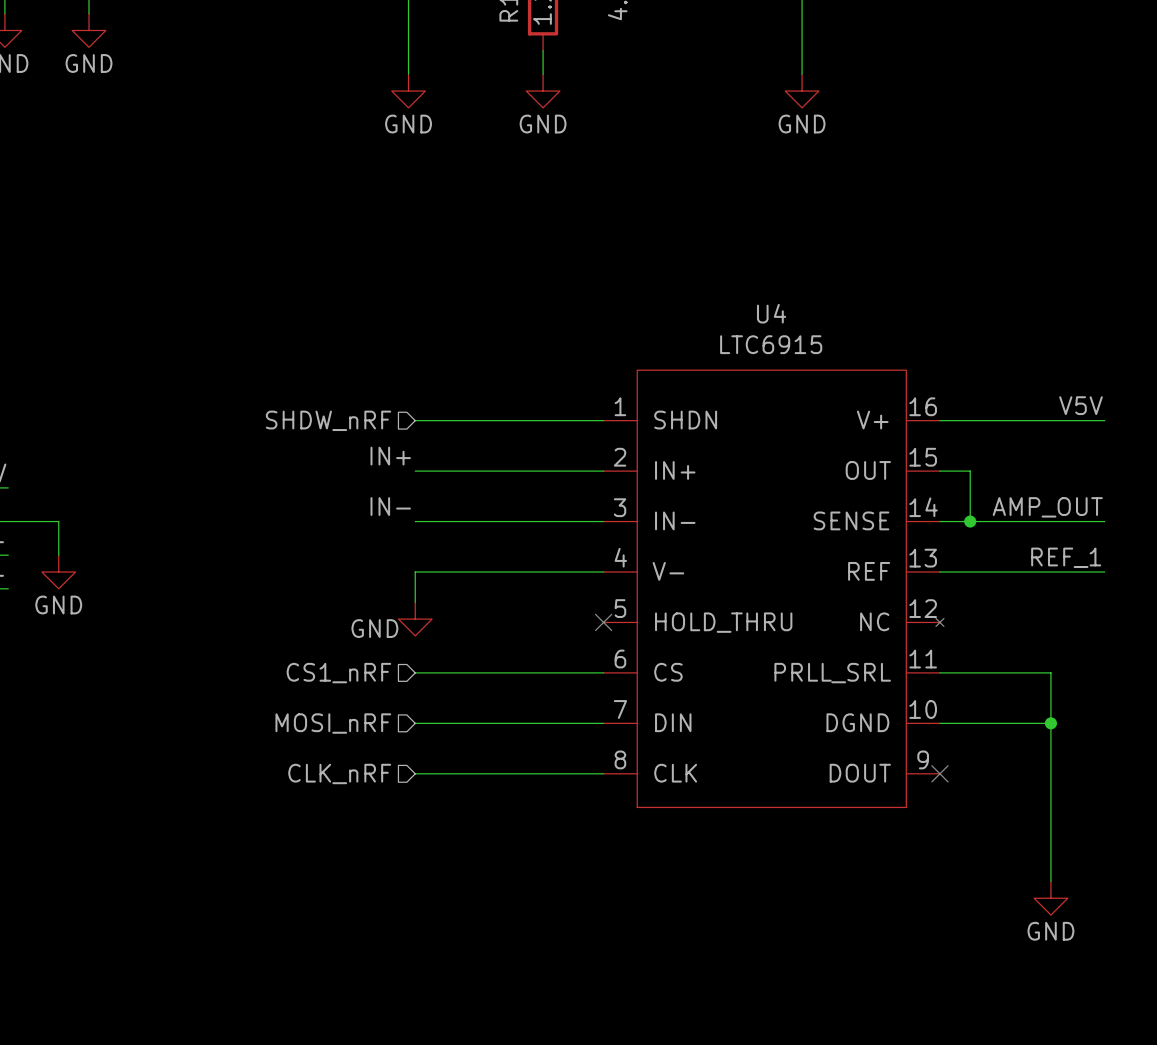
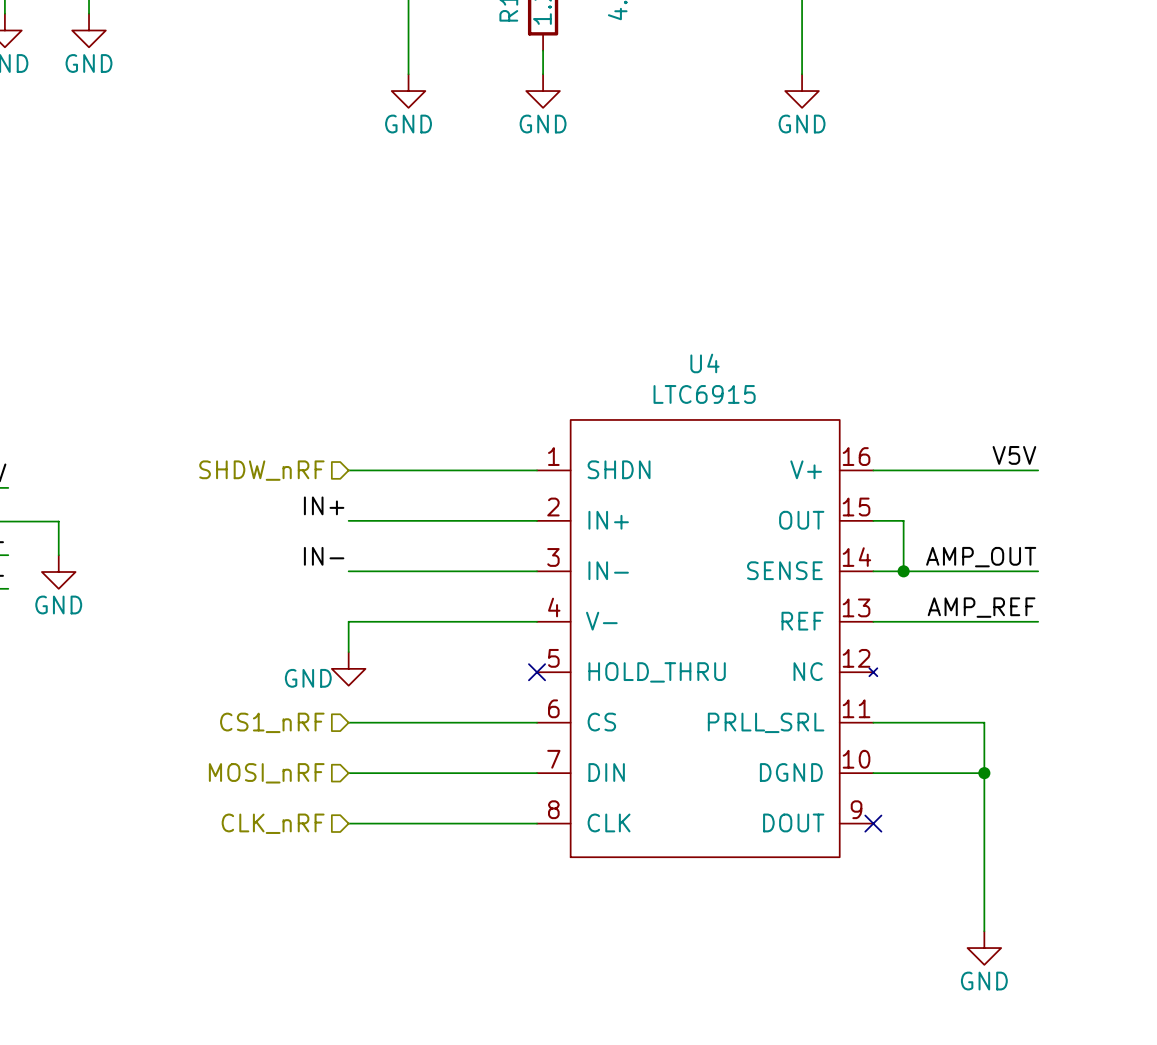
label position: V5V (1081, 405) -> V5V (1014, 455)
hierarchical label position: SHDW_nRF (328, 420) -> SHDW_nRF (261, 470)
wire: (415, 420) (603, 420) -> (348, 470) (537, 470)
wire: (939, 420) (1104, 420) -> (873, 470) (1038, 470)
label position: IN+ (390, 456) -> IN+ (324, 505)
wire: (415, 471) (603, 471) -> (348, 520) (537, 520)
wire: (939, 471) (970, 471) (970, 521) -> (873, 520) (903, 520) (903, 571)
label position: IN- (390, 506) -> IN- (324, 556)
label position: AMP_OUT (1047, 507) -> AMP_OUT (981, 557)
wire: (415, 521) (603, 521) -> (348, 571) (537, 571)
wire: (939, 521) (1104, 521) -> (873, 571) (1038, 571)
junction: (970, 521) -> none
label: REF_1 (1066, 557) -> none
junction: none -> (903, 571)
wire: (603, 572) (415, 572) (415, 602) -> (537, 621) (348, 621) (348, 652)
wire: (939, 572) (1104, 572) -> (873, 621) (1038, 621)
U4 position: (773, 588) -> (707, 638)
label: none -> AMP_REF (981, 607)
power symbol position: GND (415, 619) -> GND (348, 668)
no-connect mark: (603, 622) -> none
wire: (415, 672) (603, 672) -> (348, 722) (537, 722)
no-connect mark: none -> (537, 672)
wire: (939, 672) (1050, 672) (1050, 881) -> (873, 722) (984, 722) (984, 931)
hierarchical label position: CS1_nRF (338, 673) -> CS1_nRF (272, 722)
hierarchical label position: MOSI_nRF (333, 723) -> MOSI_nRF (266, 773)
wire: (415, 723) (603, 723) -> (348, 773) (537, 773)
wire: (939, 723) (1050, 723) -> (873, 773) (984, 773)
junction: (1050, 723) -> none
hierarchical label position: CLK_nRF (339, 773) -> CLK_nRF (273, 823)
wire: (415, 773) (603, 773) -> (348, 823) (537, 823)
no-connect mark: (939, 773) -> none
junction: none -> (984, 773)
no-connect mark: none -> (873, 823)
power symbol position: GND (1050, 898) -> GND (984, 948)

